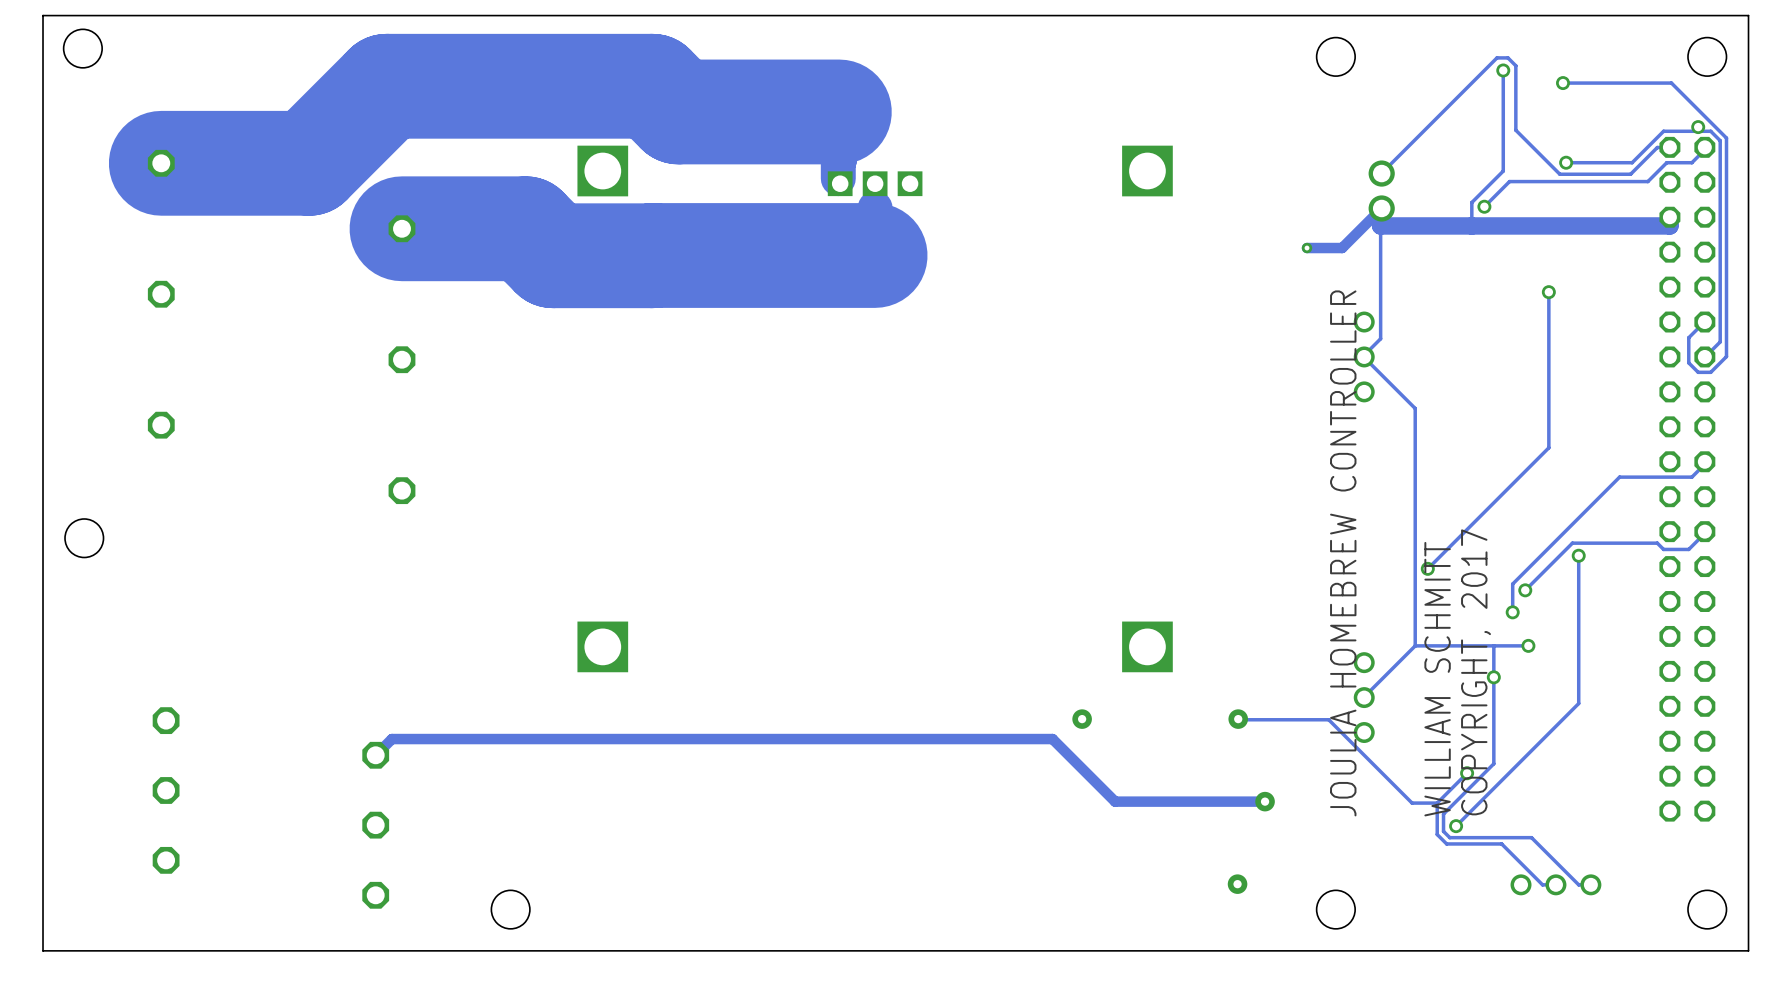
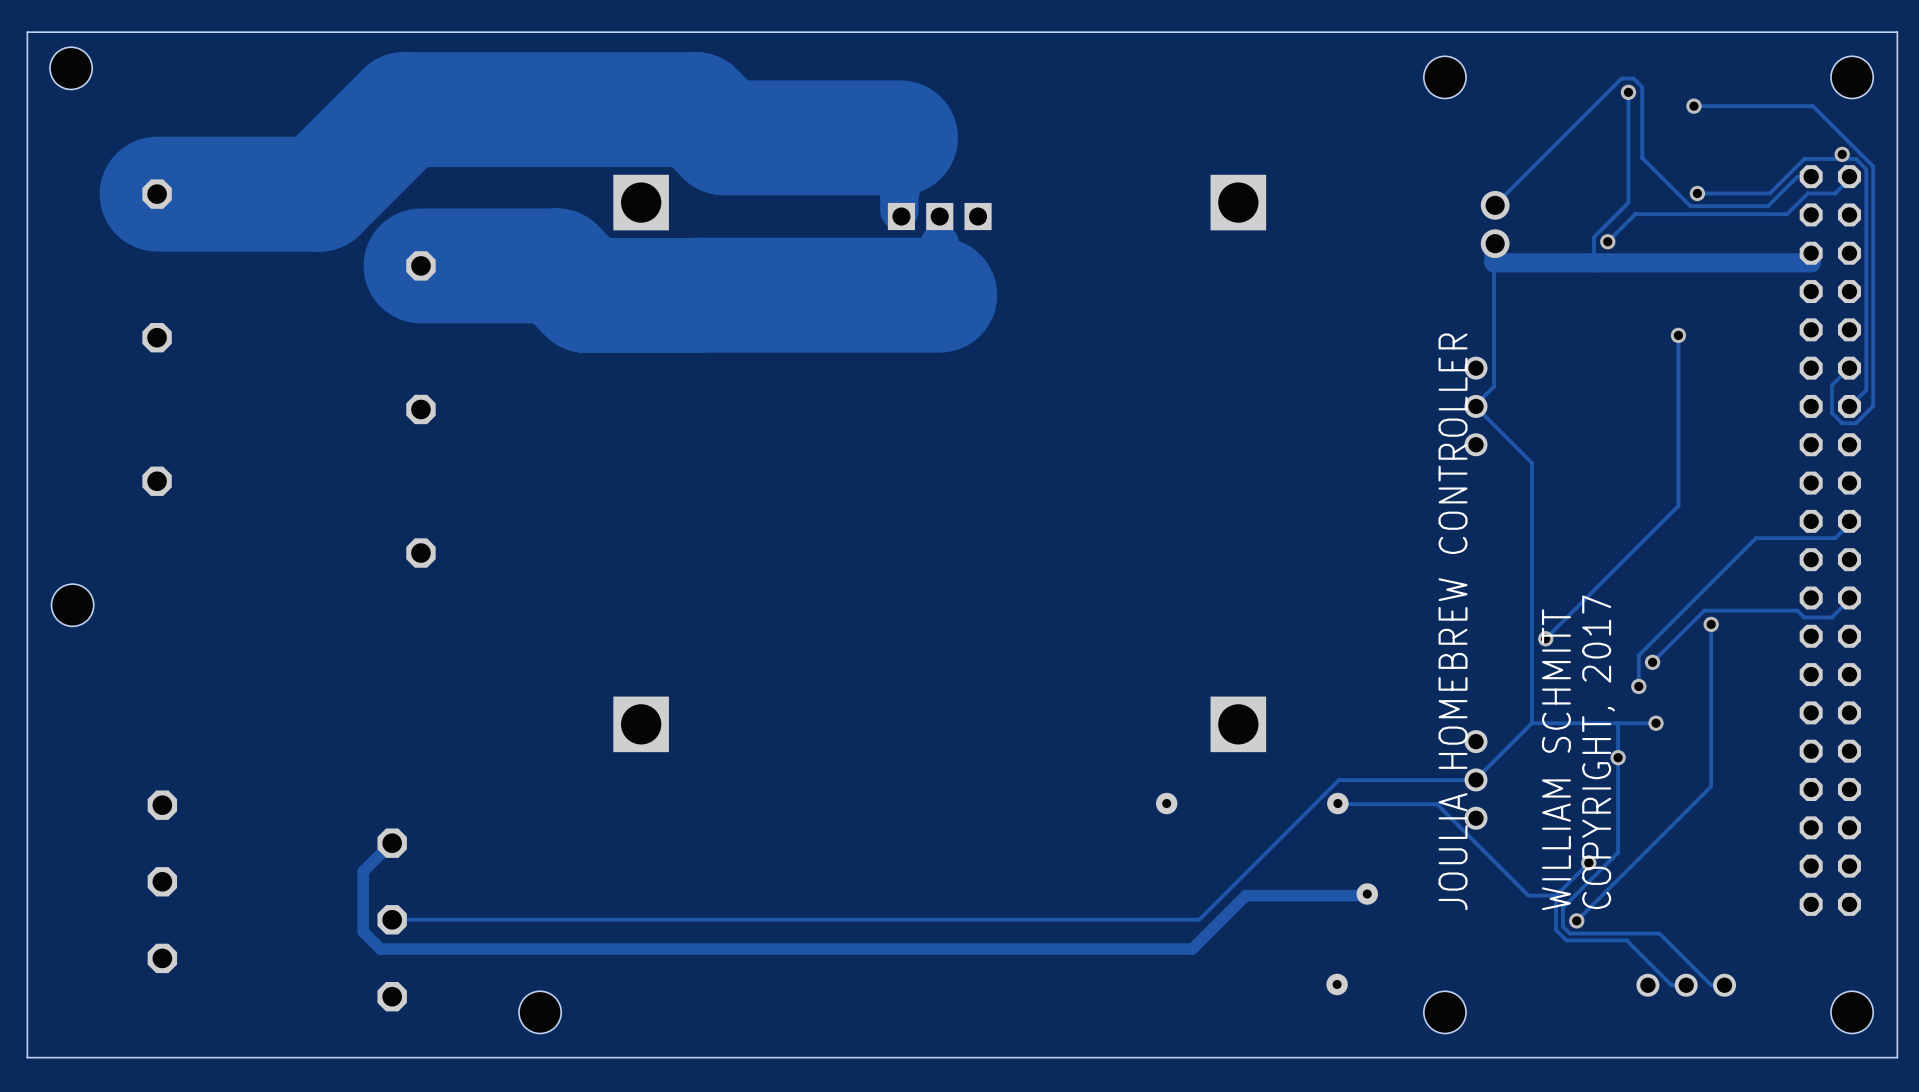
track: (1381, 208) (1342, 248) (1307, 248) -> none
via: (1307, 248) -> none
track: none -> (1476, 779) (1338, 780) (1199, 919) (392, 919)
track: (375, 755) (391, 739) (1052, 739) (1115, 801) (1265, 801) -> (392, 843) (363, 871) (363, 931) (380, 949) (1192, 949) (1245, 895) (1366, 895) (1367, 894)

